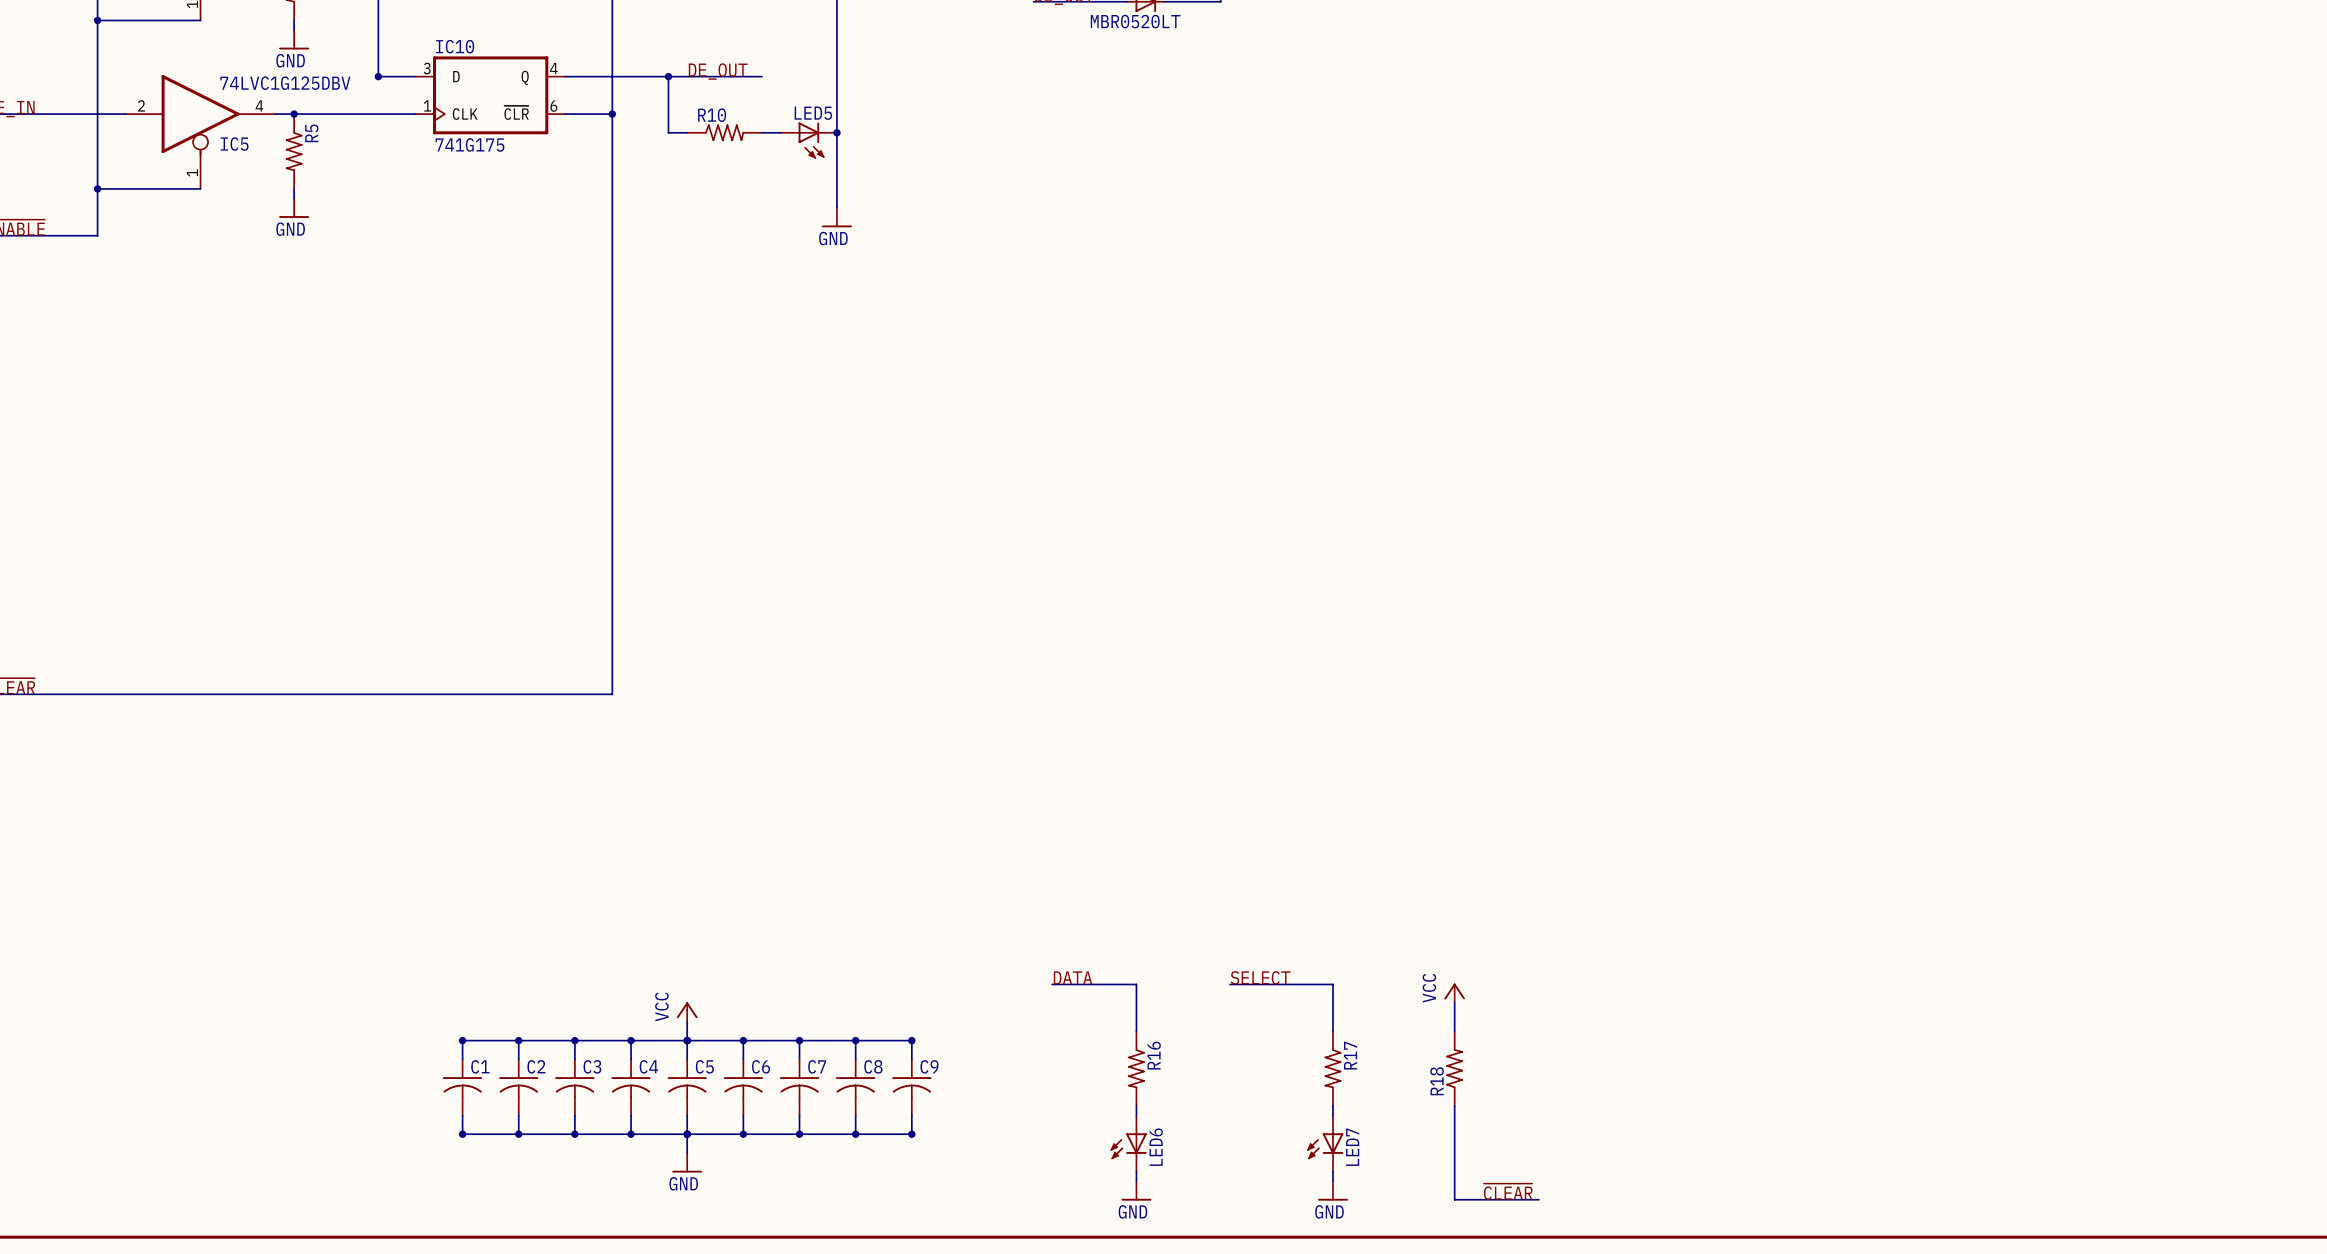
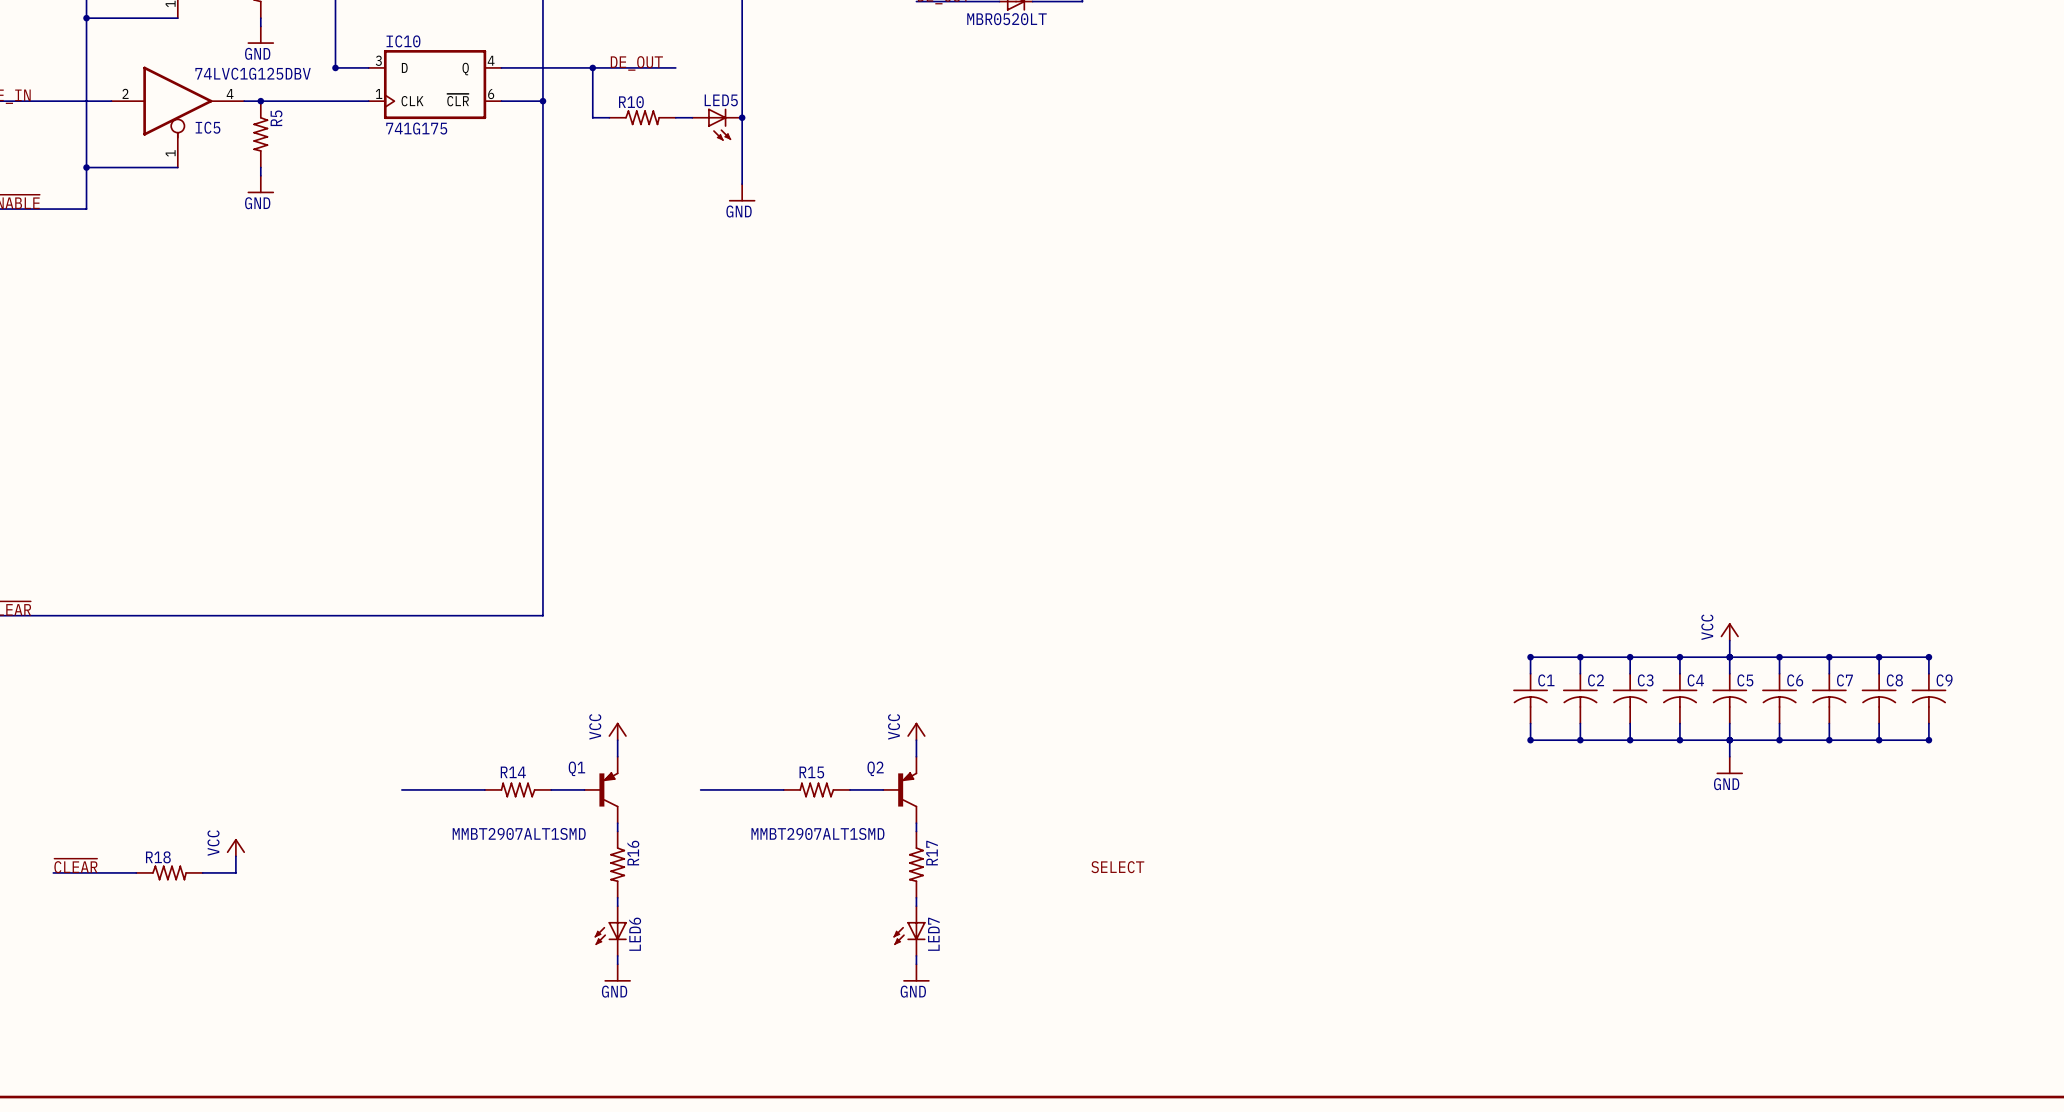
power symbol: none -> VCC (1729, 631)
wire: none -> (1729, 640) (1729, 673)
junction: none -> (1530, 657)
wire: none -> (1580, 657) (1580, 673)
junction: none -> (1580, 657)
wire: none -> (1630, 657) (1630, 673)
junction: none -> (1630, 657)
wire: none -> (1679, 657) (1679, 673)
junction: none -> (1679, 657)
junction: none -> (1729, 657)
wire: none -> (1779, 657) (1779, 673)
junction: none -> (1779, 657)
wire: none -> (1829, 657) (1829, 673)
junction: none -> (1829, 657)
wire: none -> (1879, 657) (1879, 673)
junction: none -> (1879, 657)
junction: none -> (1928, 657)
wire: none -> (1530, 673) (1530, 657) (1928, 657) (1928, 673)
wire: none -> (1530, 723) (1530, 740) (1928, 740) (1928, 723)
wire: none -> (1580, 723) (1580, 740)
wire: none -> (1630, 723) (1630, 740)
wire: none -> (1679, 723) (1679, 740)
wire: none -> (1729, 723) (1729, 756)
wire: none -> (1779, 723) (1779, 740)
wire: none -> (1829, 723) (1829, 740)
wire: none -> (1879, 723) (1879, 740)
power symbol: none -> VCC (617, 731)
power symbol: none -> VCC (916, 731)
wire: none -> (617, 740) (617, 756)
wire: none -> (916, 740) (916, 756)
junction: none -> (1530, 740)
junction: none -> (1580, 740)
junction: none -> (1630, 740)
junction: none -> (1679, 740)
junction: none -> (1729, 740)
junction: none -> (1779, 740)
junction: none -> (1829, 740)
junction: none -> (1879, 740)
junction: none -> (1928, 740)
power symbol: none -> GND (1729, 765)
wire: none -> (401, 789) (484, 789)
R14: none -> (518, 789)
wire: none -> (551, 789) (584, 789)
Q1: none -> MMBT2907ALT1SMD (601, 789)
wire: none -> (700, 789) (783, 789)
R15: none -> (816, 789)
wire: none -> (850, 789) (883, 789)
Q2: none -> MMBT2907ALT1SMD (900, 789)
wire: none -> (617, 823) (617, 831)
wire: none -> (916, 823) (916, 831)
power symbol: none -> VCC (235, 847)
wire: none -> (235, 856) (235, 872) (202, 872)
label: none -> ~{CLEAR} (75, 865)
label: DATA (1073, 977) -> none
wire: none -> (53, 872) (136, 872)
wire: (1052, 984) (1136, 984) (1136, 1031) -> none
wire: (1230, 984) (1332, 984) (1332, 1031) -> none
power symbol: VCC (1454, 993) -> none
wire: (1454, 1003) (1454, 1031) -> none
power symbol: VCC (687, 1012) -> none
wire: none -> (617, 897) (617, 906)
wire: (687, 1021) (687, 1059) -> none
junction: (462, 1040) -> none
wire: (518, 1040) (518, 1059) -> none
junction: (518, 1040) -> none
wire: (574, 1040) (574, 1059) -> none
junction: (574, 1040) -> none
wire: (631, 1040) (631, 1059) -> none
junction: (631, 1040) -> none
junction: (687, 1040) -> none
wire: (743, 1040) (743, 1059) -> none
junction: (743, 1040) -> none
wire: (799, 1040) (799, 1059) -> none
junction: (799, 1040) -> none
wire: (855, 1040) (855, 1059) -> none
junction: (855, 1040) -> none
junction: (911, 1040) -> none
wire: (462, 1059) (462, 1040) (911, 1040) (911, 1059) -> none
R16 position: (1136, 1068) -> (617, 864)
R17 position: (1332, 1068) -> (916, 864)
R18 rotation: 0° (1454, 1068) -> 90° clockwise (169, 872)
R18 position: (1454, 1068) -> (169, 872)
wire: none -> (617, 955) (617, 964)
C1 position: (462, 1087) -> (1530, 698)
C2 position: (518, 1087) -> (1580, 698)
C3 position: (574, 1087) -> (1630, 698)
C4 position: (631, 1087) -> (1679, 698)
C5 position: (687, 1087) -> (1729, 698)
C6 position: (743, 1087) -> (1779, 698)
C7 position: (799, 1087) -> (1829, 698)
C8 position: (855, 1087) -> (1879, 698)
C9 position: (911, 1087) -> (1928, 698)
wire: (1136, 1106) (1136, 1115) -> (916, 897) (916, 906)
wire: (1332, 1106) (1332, 1115) -> none
wire: (1454, 1106) (1454, 1199) (1538, 1199) -> none
wire: (462, 1115) (462, 1134) (911, 1134) (911, 1115) -> none
wire: (518, 1115) (518, 1134) -> none
wire: (574, 1115) (574, 1134) -> none
wire: (631, 1115) (631, 1134) -> none
wire: (687, 1115) (687, 1152) -> none
wire: (743, 1115) (743, 1134) -> none
wire: (799, 1115) (799, 1134) -> none
wire: (855, 1115) (855, 1134) -> none
junction: (462, 1134) -> none
junction: (518, 1134) -> none
junction: (574, 1134) -> none
junction: (631, 1134) -> none
junction: (687, 1134) -> none
junction: (743, 1134) -> none
junction: (799, 1134) -> none
junction: (855, 1134) -> none
junction: (911, 1134) -> none
LED6 position: (1128, 1143) -> (610, 931)
LED7 position: (1325, 1143) -> (909, 931)
power symbol position: GND (687, 1162) -> GND (617, 972)
wire: (1136, 1171) (1136, 1181) -> (916, 955) (916, 964)
wire: (1332, 1171) (1332, 1181) -> none
power symbol position: GND (1136, 1190) -> GND (916, 972)
power symbol: GND (1332, 1190) -> none
label: ~{CLEAR} (1508, 1191) -> none

